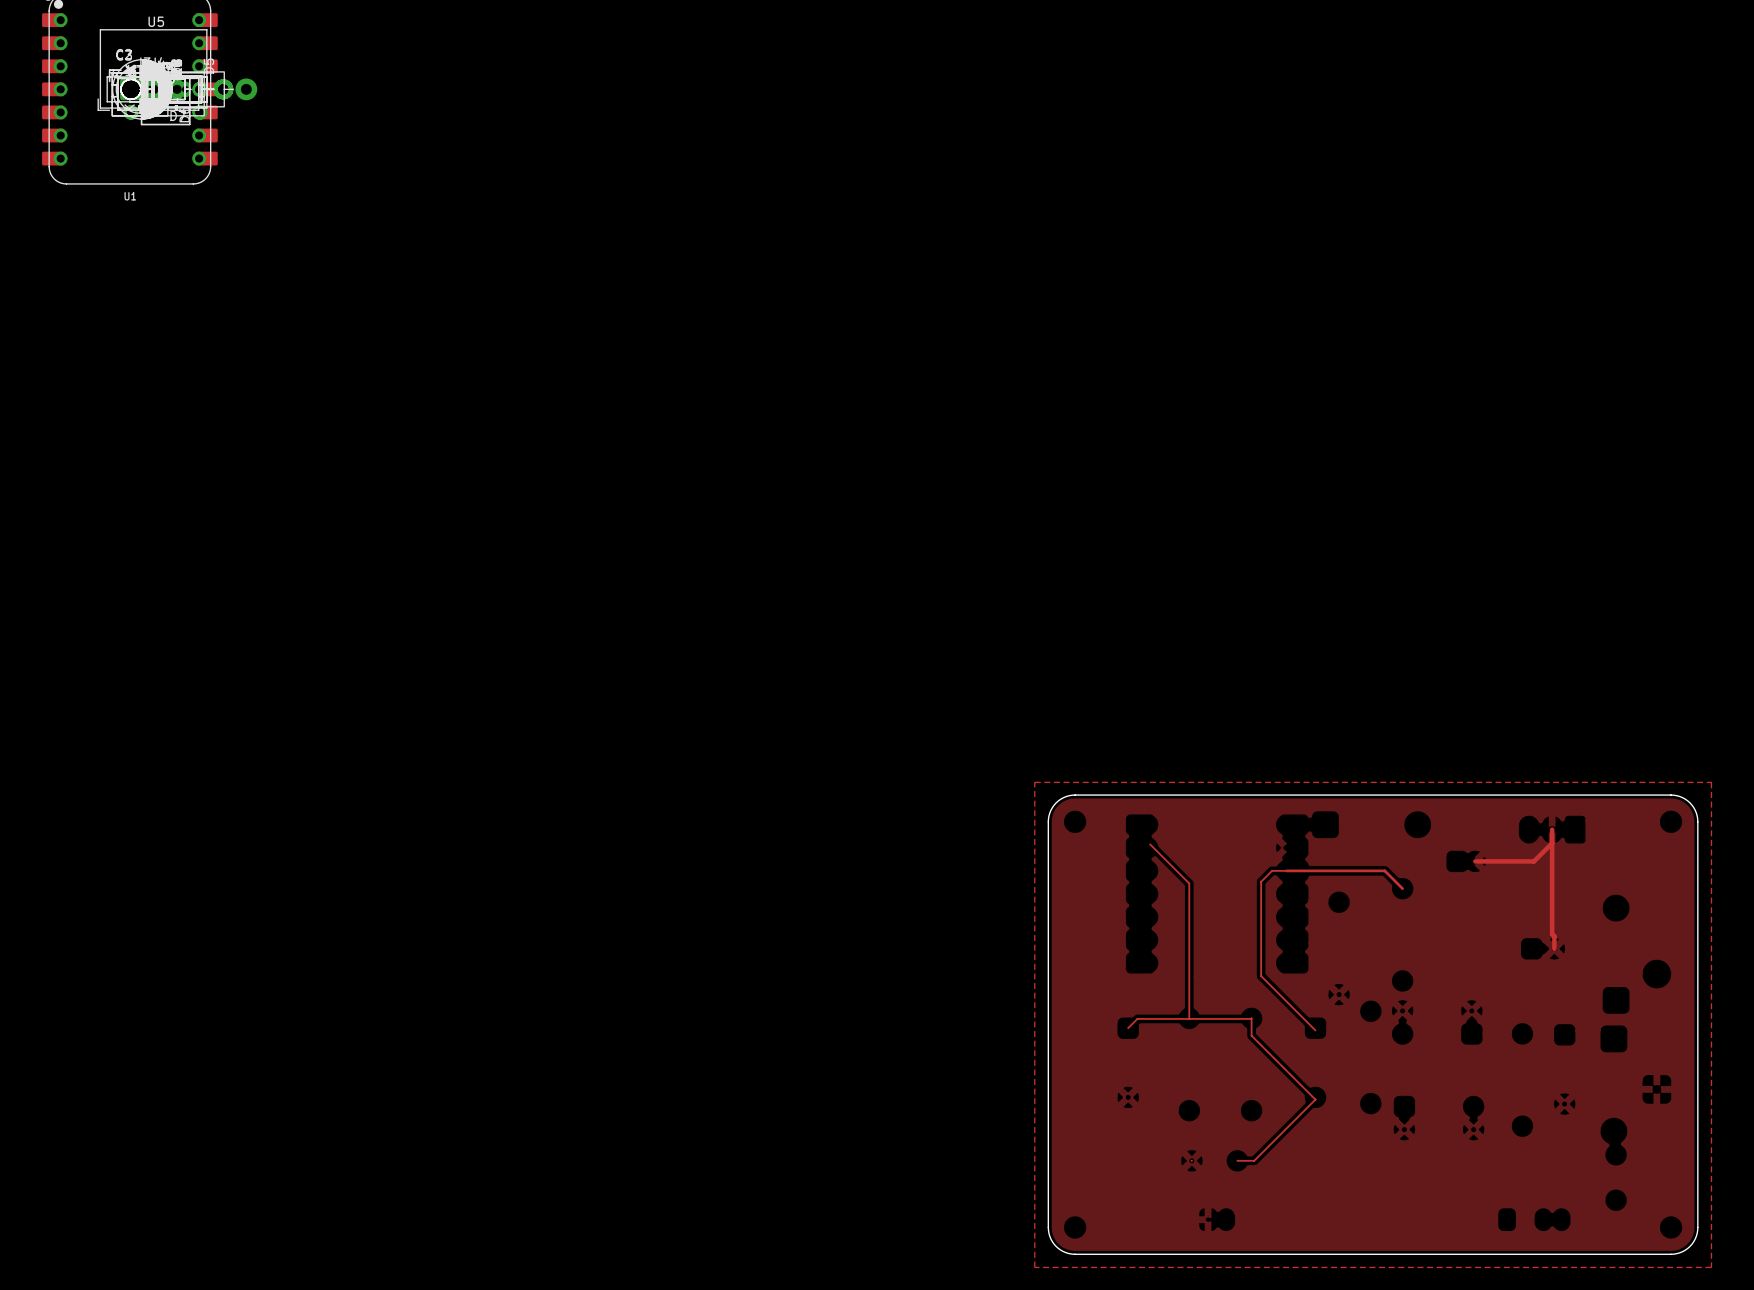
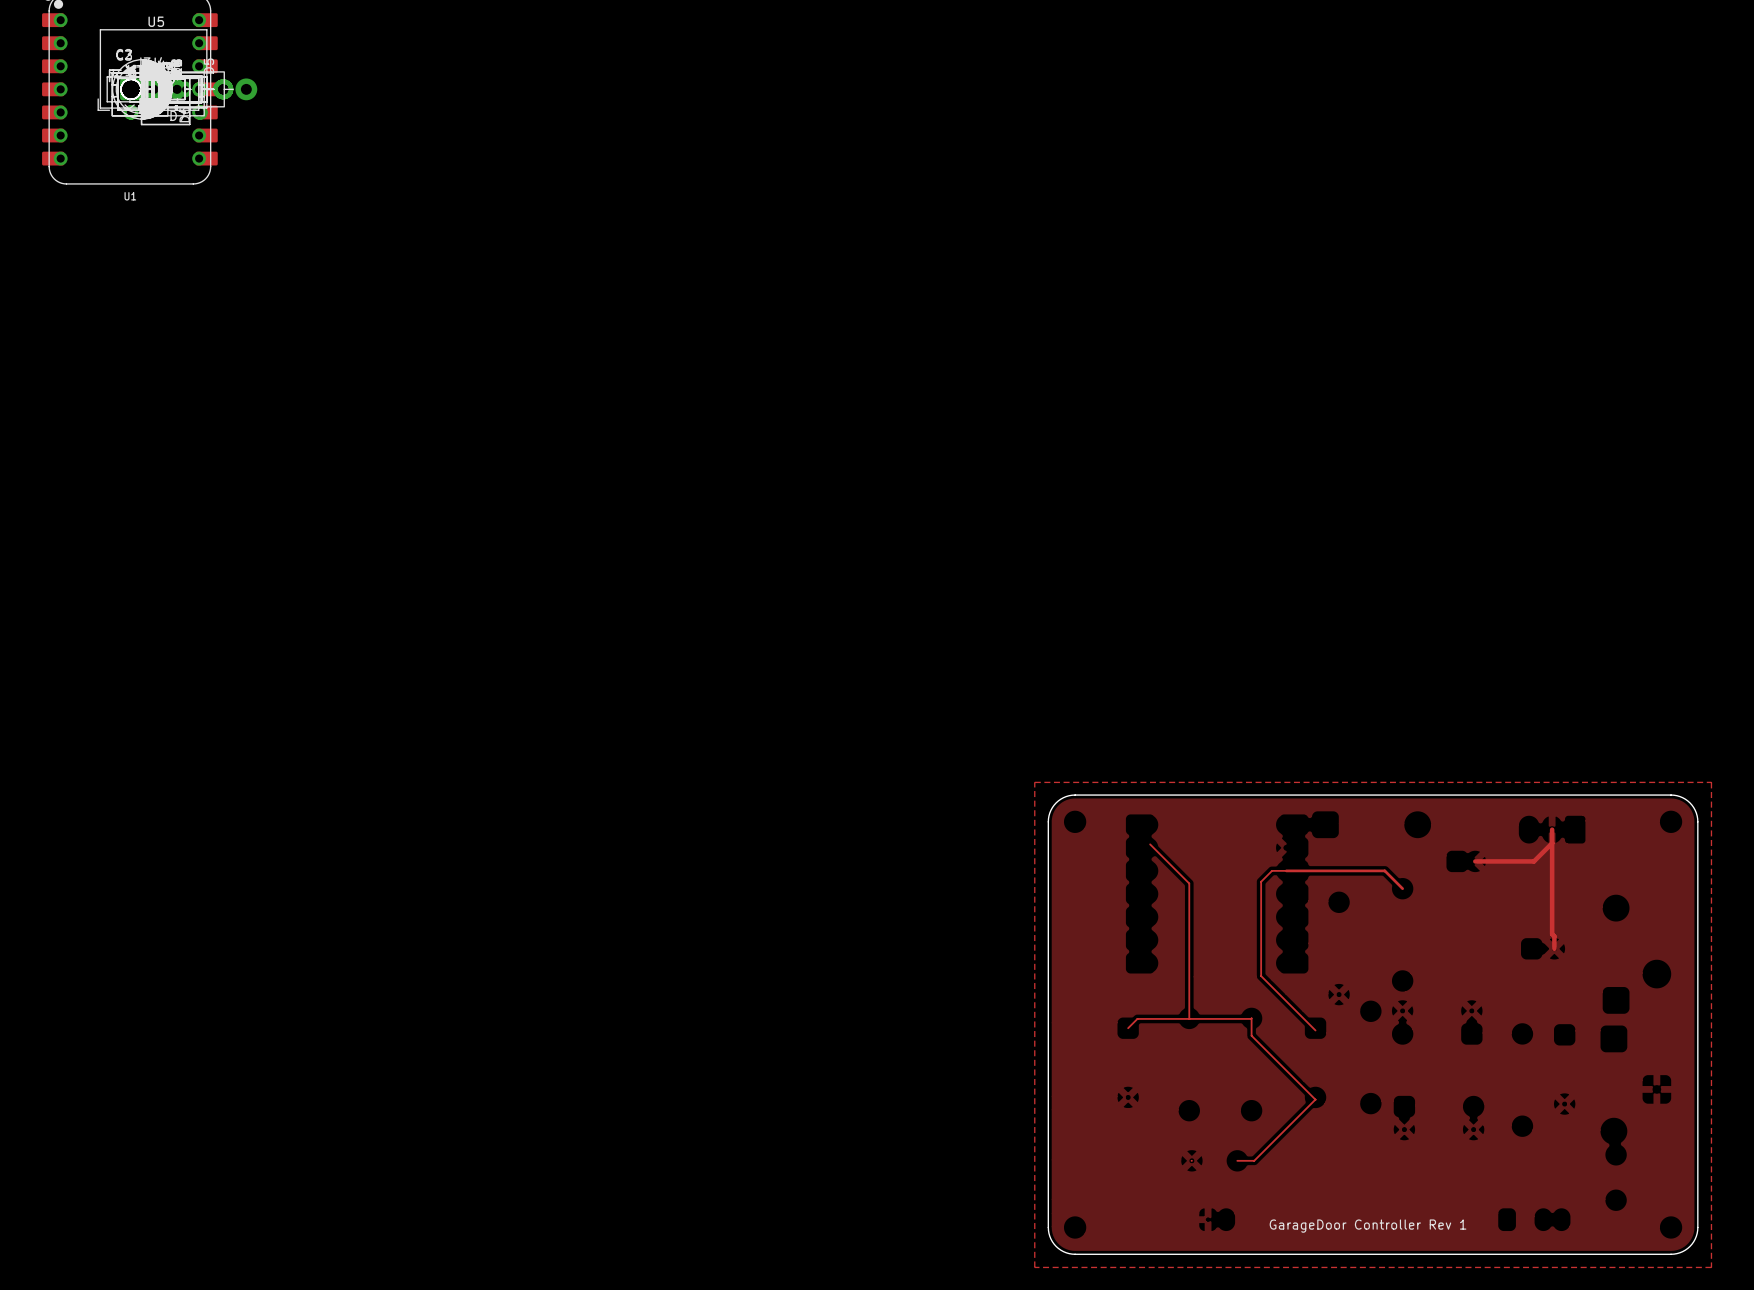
text: none -> GarageDoor Controller Rev 1 (1368, 1226)

